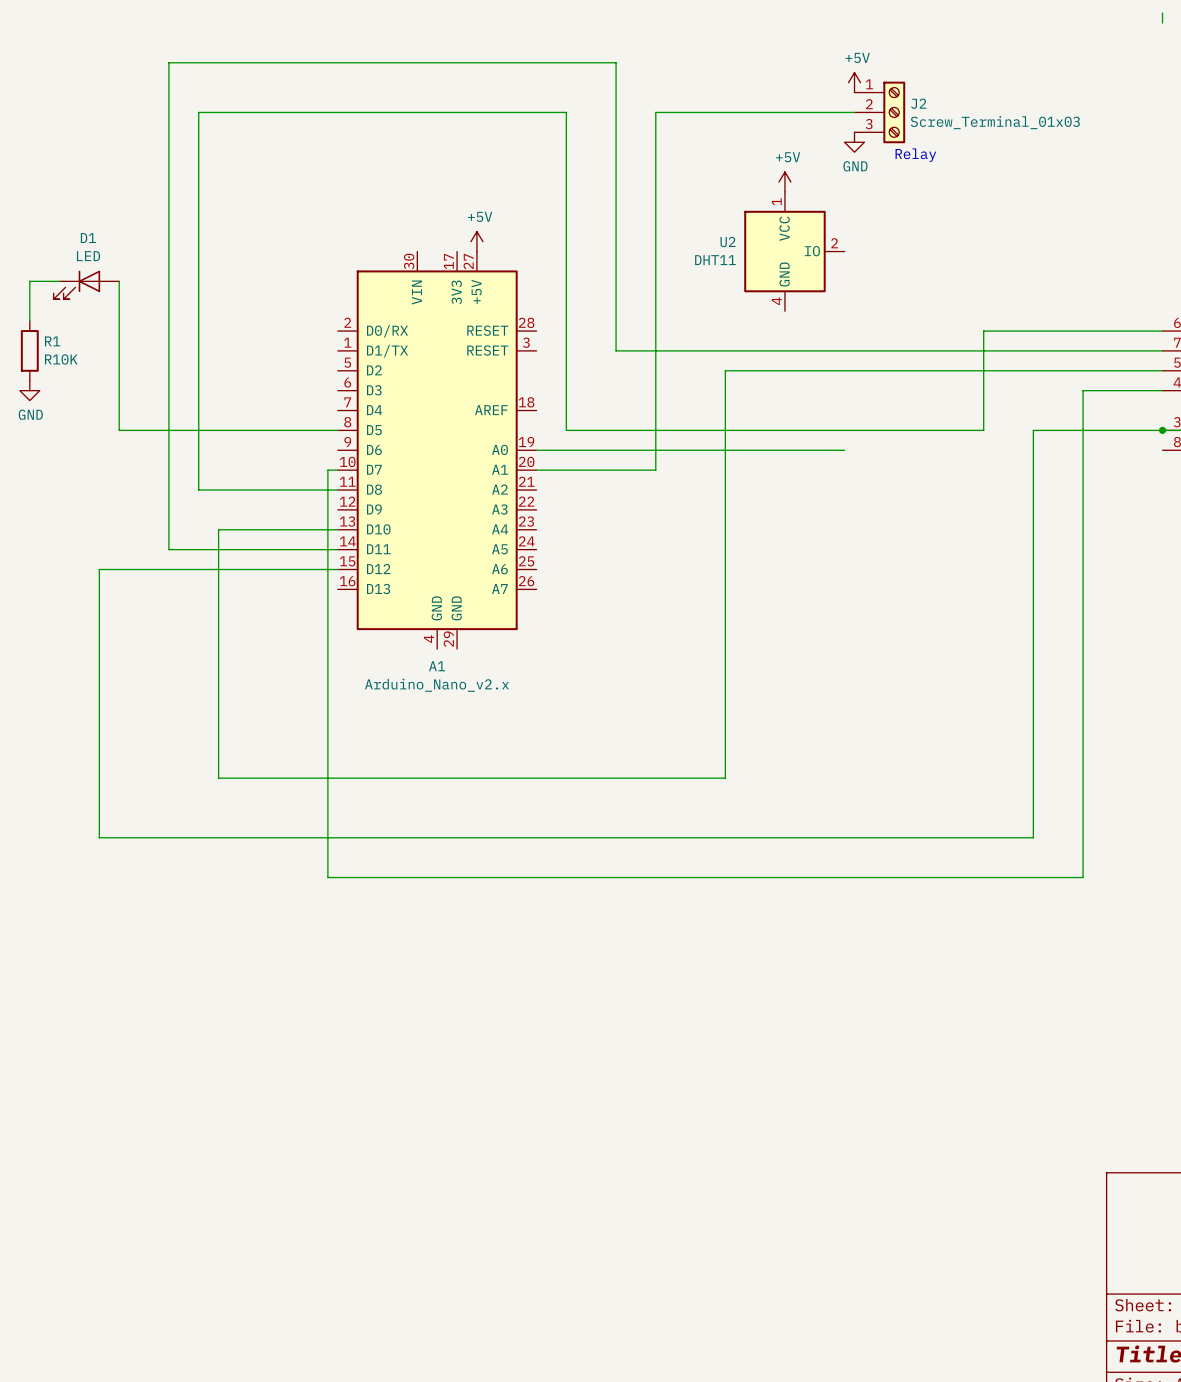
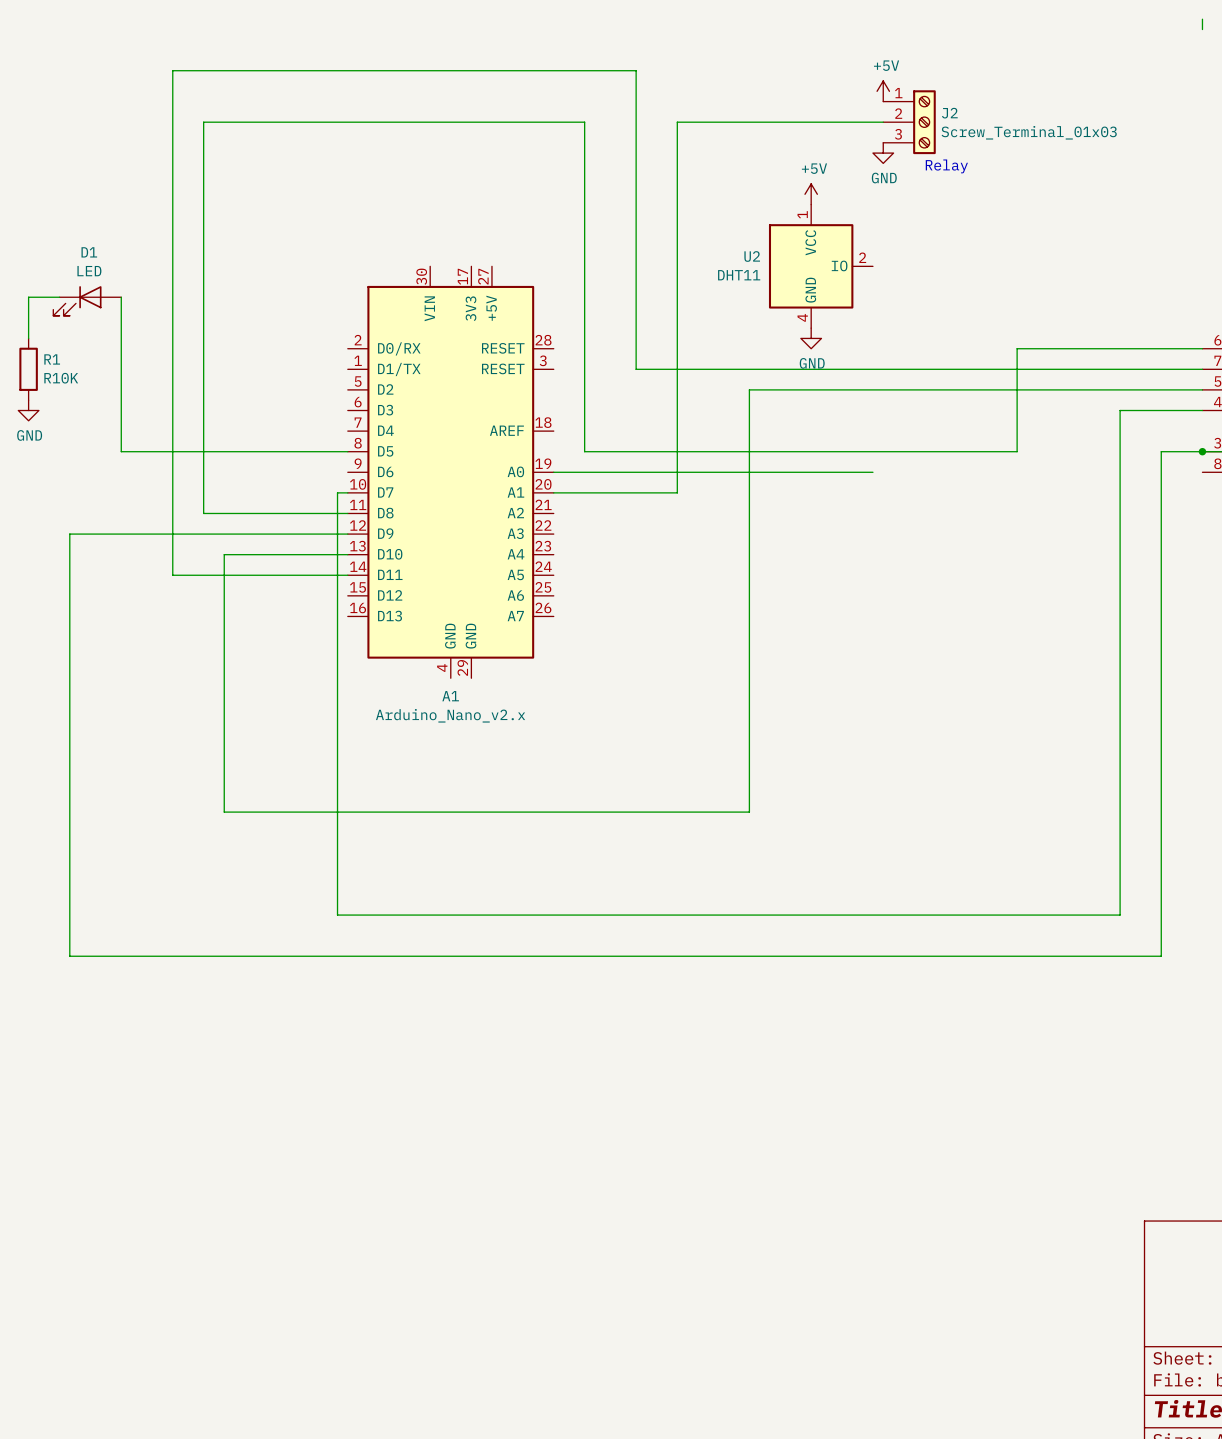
power symbol: +5V (476, 241) -> none
power symbol: none -> GND (811, 338)
wire: (1122, 430) (1033, 430) (1033, 837) (99, 837) (99, 569) (337, 569) -> (1161, 451) (1161, 956) (69, 956) (69, 534) (347, 534)

